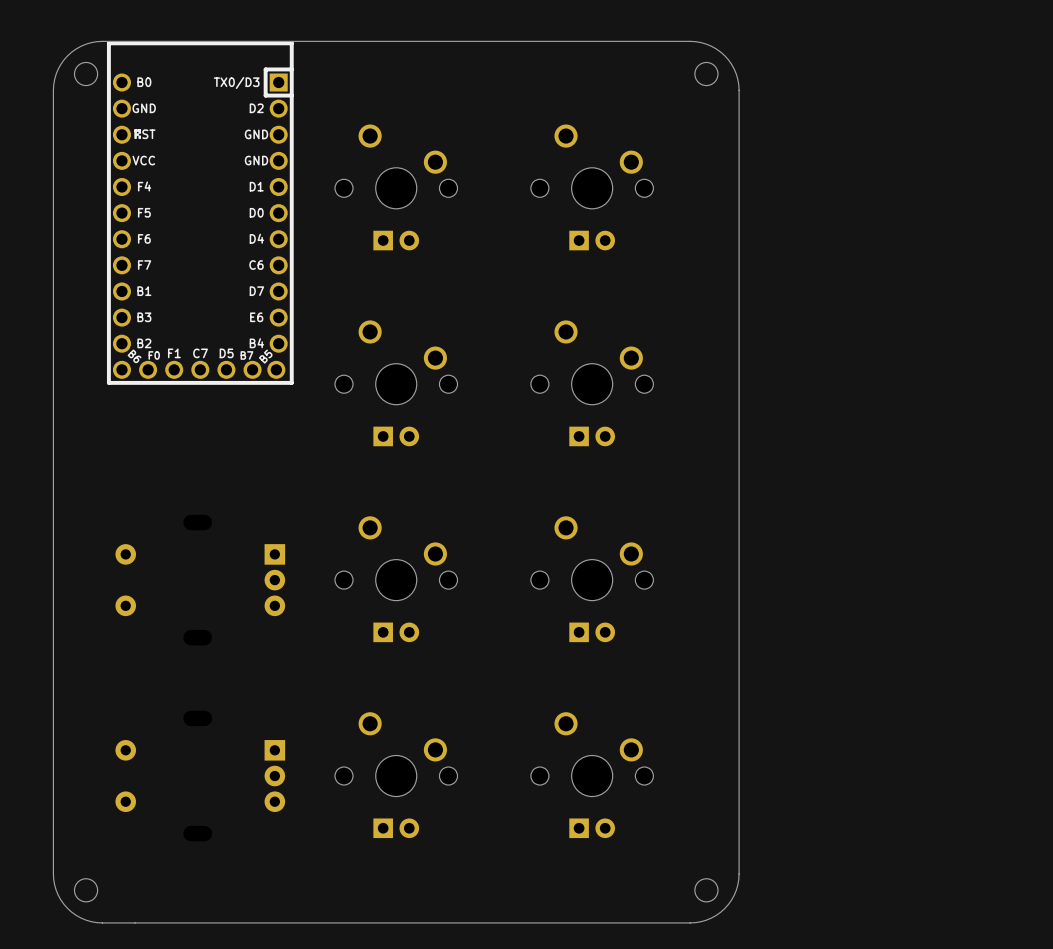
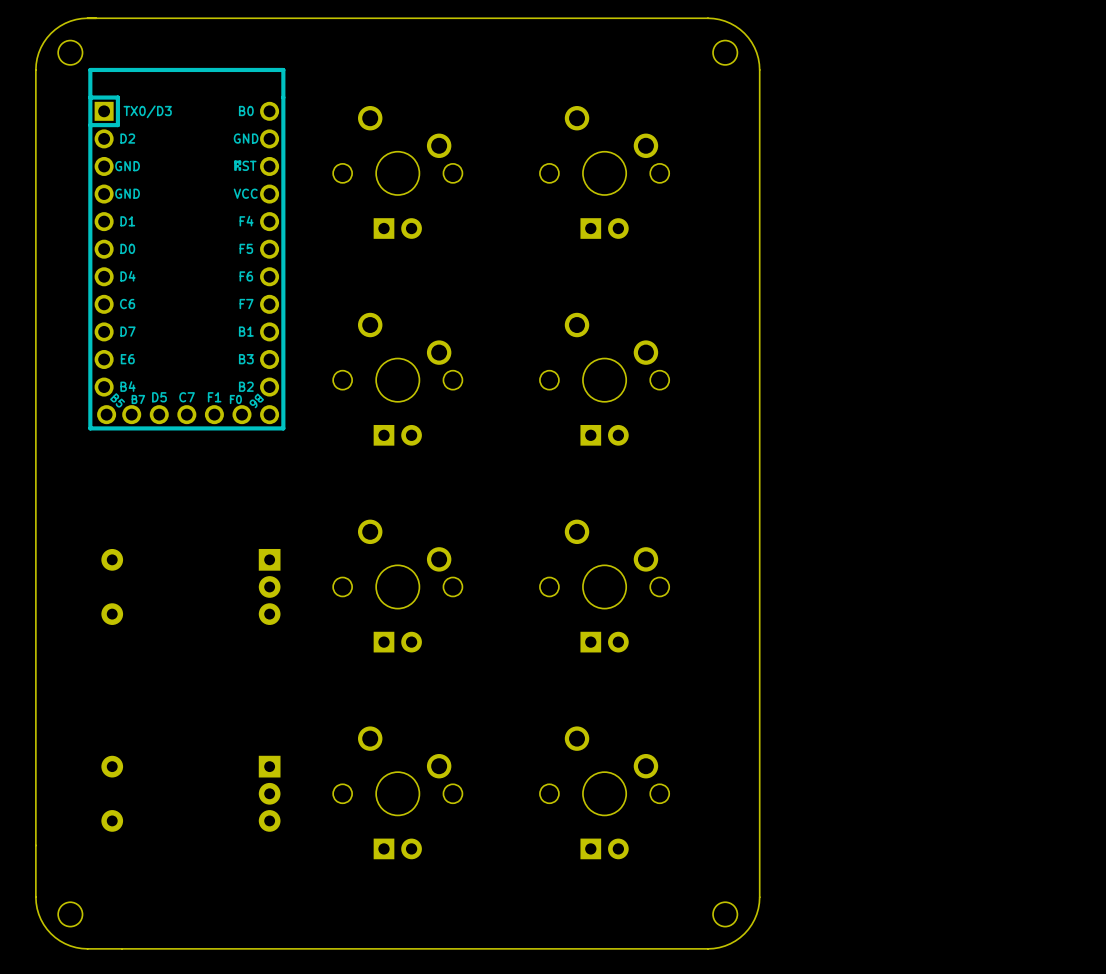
part side: top (200, 213) -> bottom (186, 249)

